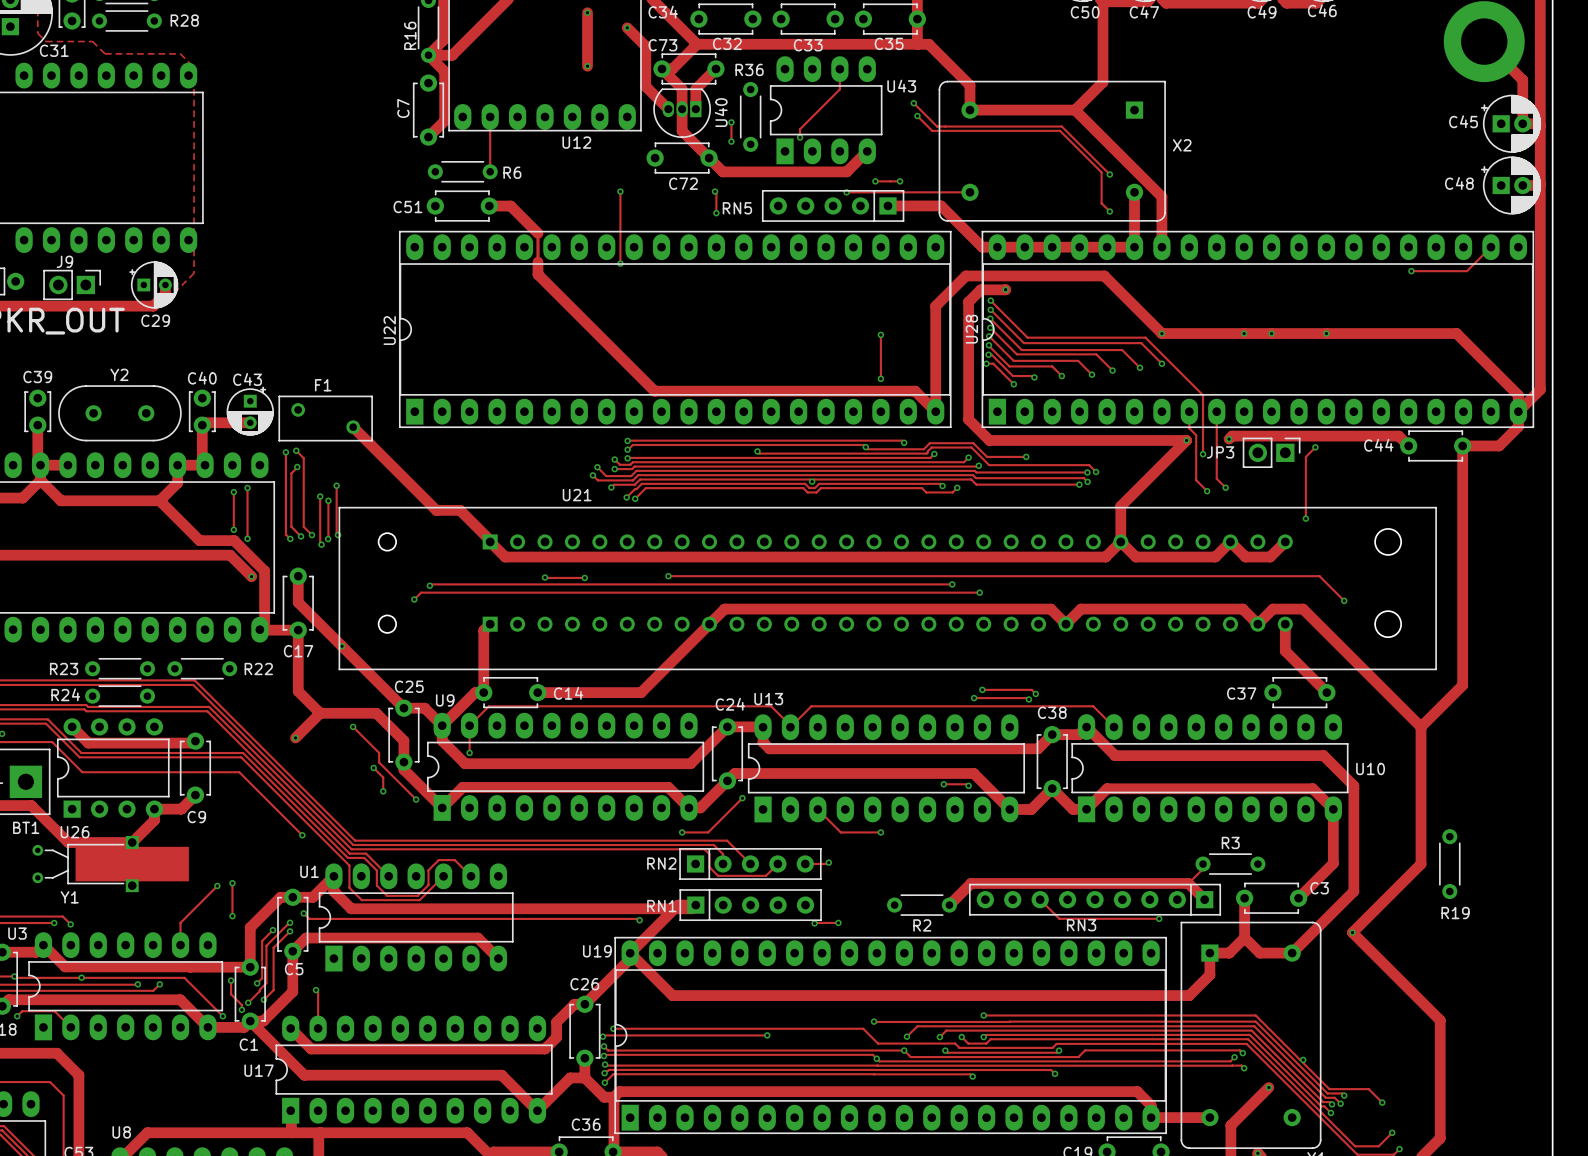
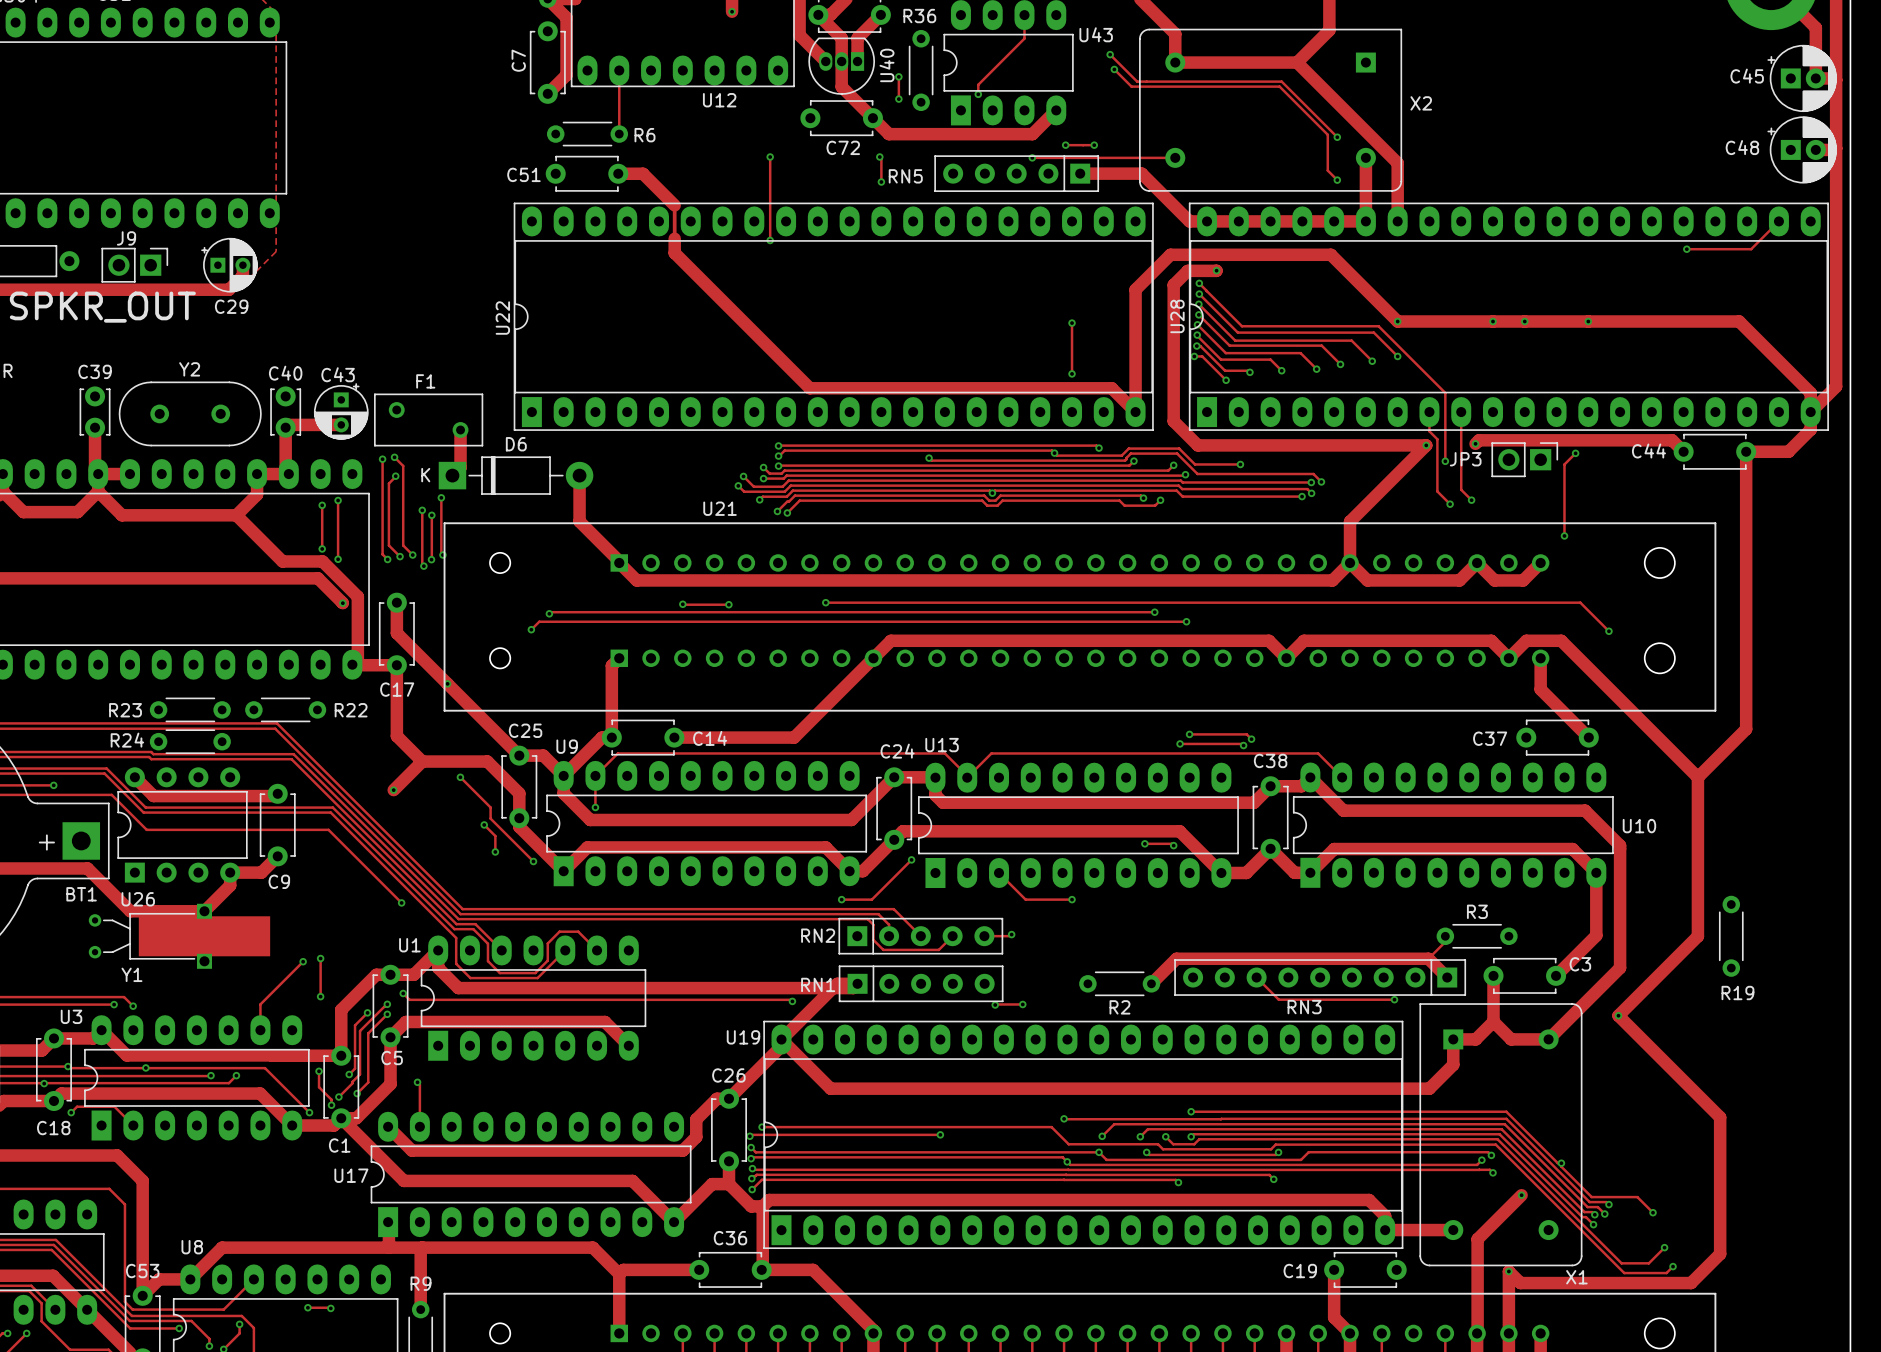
track: (353, 427) (436, 510) (460, 510) -> (579, 475) (579, 521) (584, 526)
track: none -> (460, 430) (460, 467) (452, 475)
D6: none -> (516, 475)

